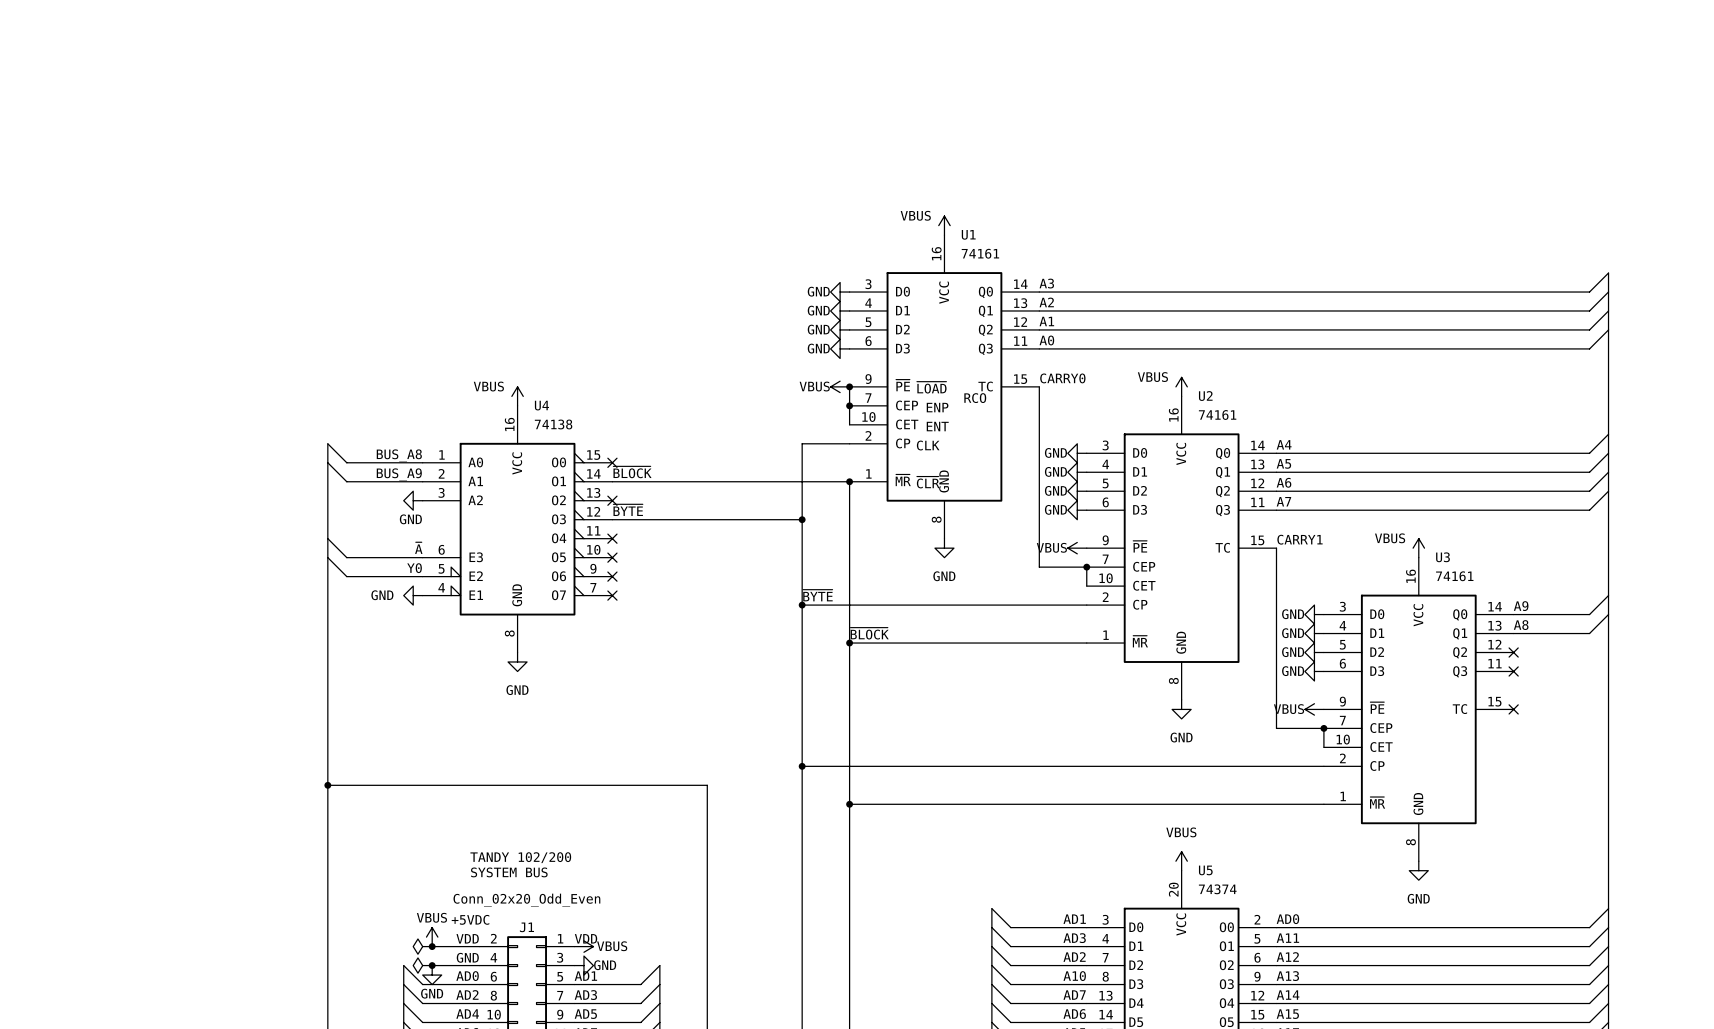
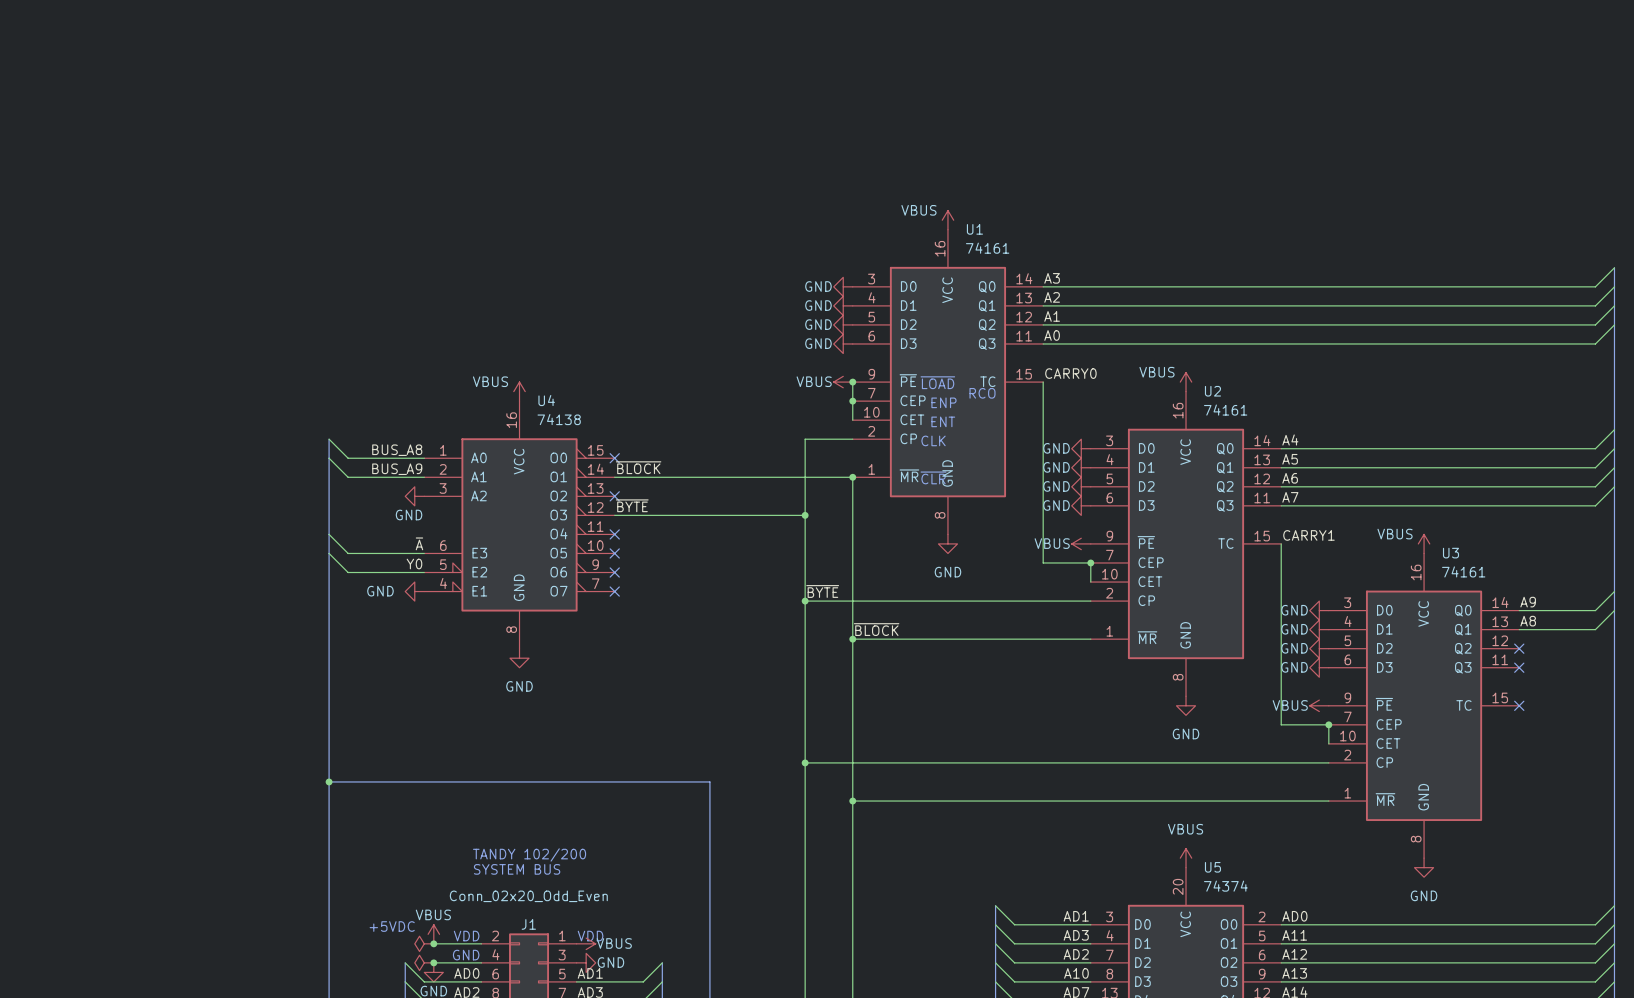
text position: +5VDC (470, 919) -> +5VDC (392, 926)

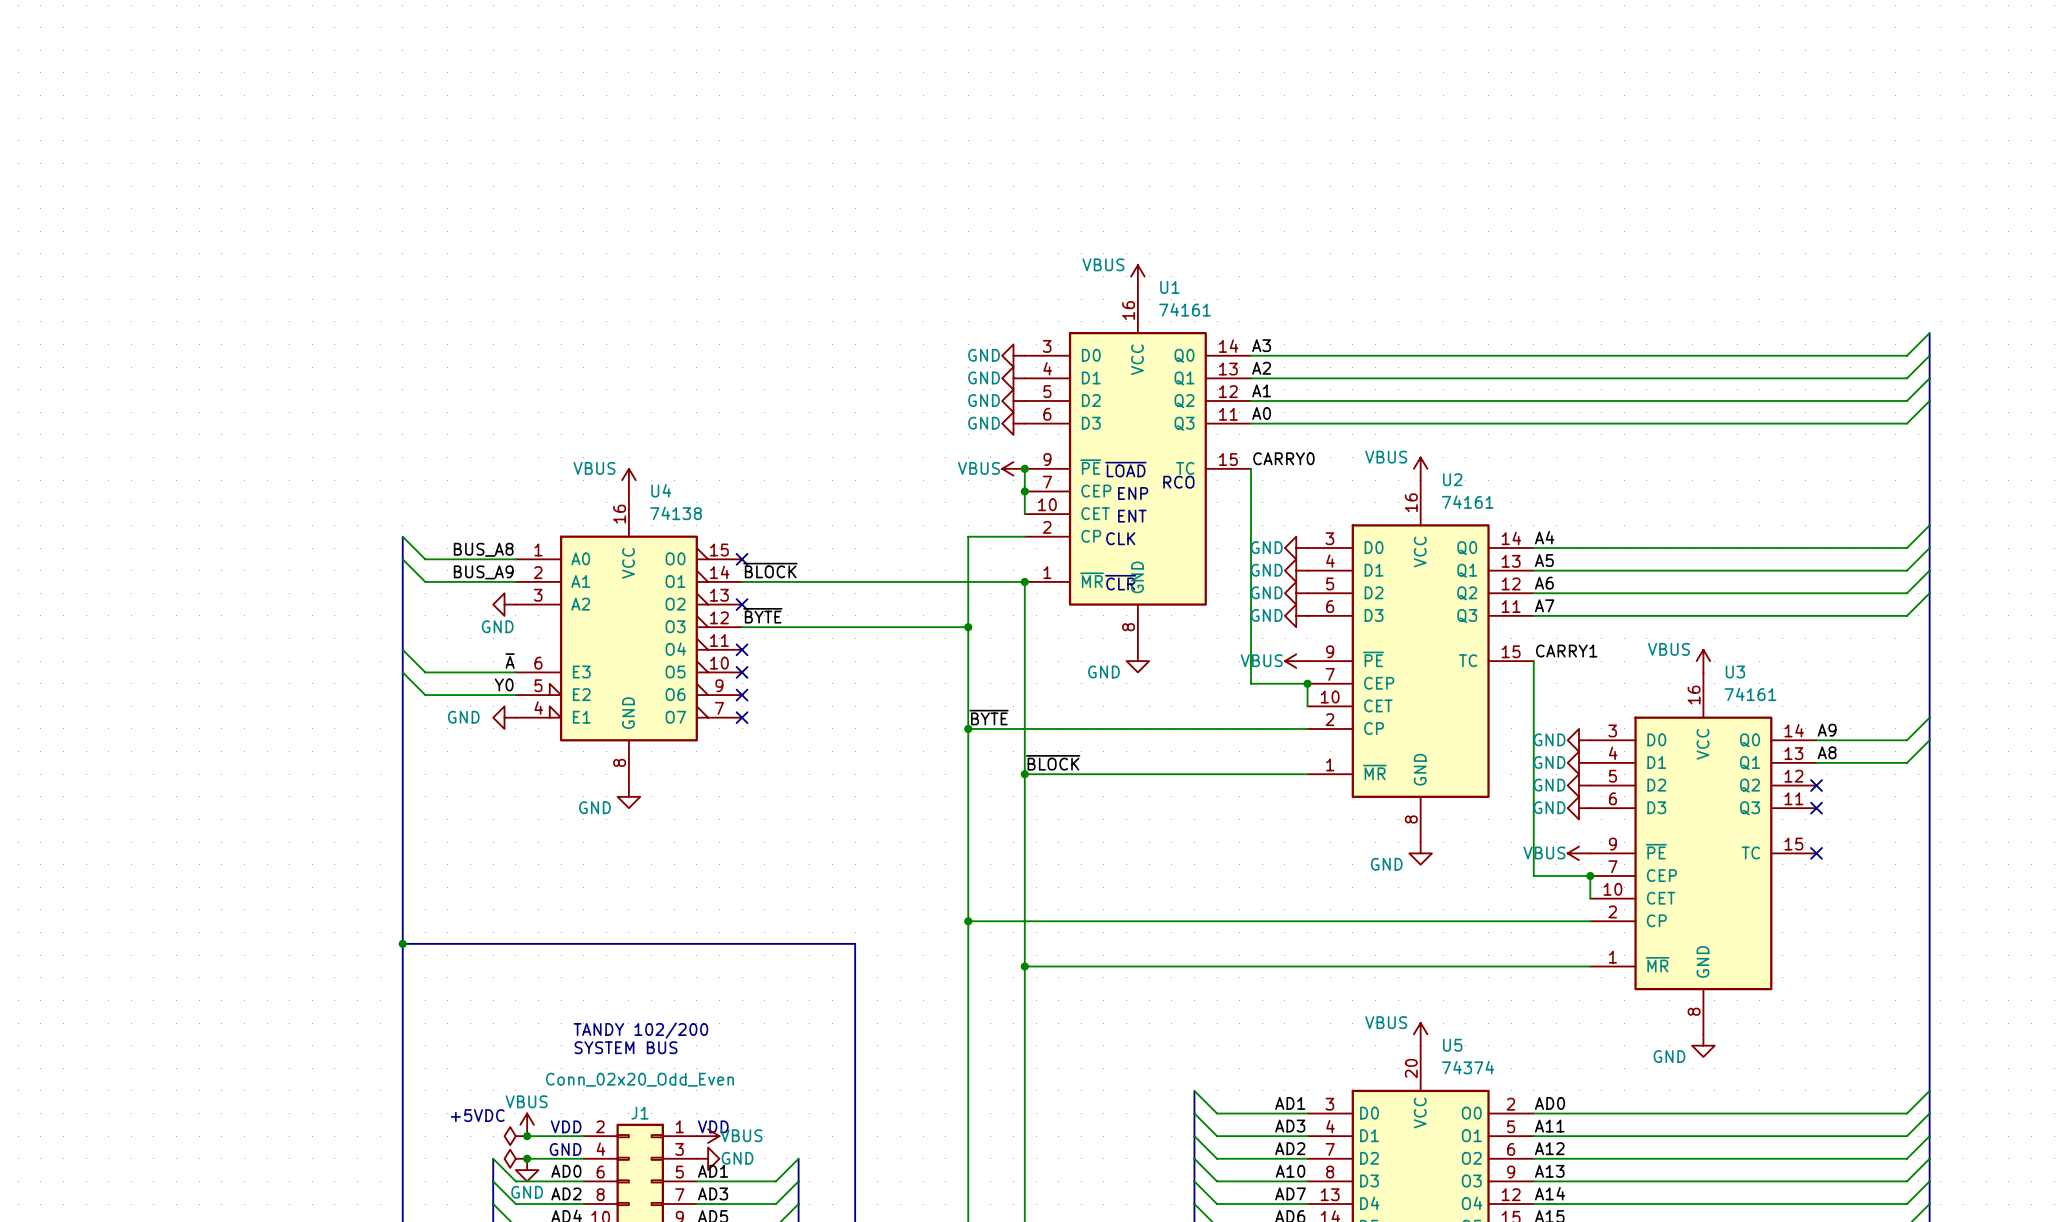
power symbol text position: GND (947, 572) -> GND (1103, 672)
power symbol text position: GND (519, 686) -> GND (595, 807)
power symbol text position: GND (1186, 734) -> GND (1386, 864)
power symbol text position: VBUS (1185, 829) -> VBUS (1386, 1022)
power symbol text position: GND (1424, 895) -> GND (1669, 1056)

